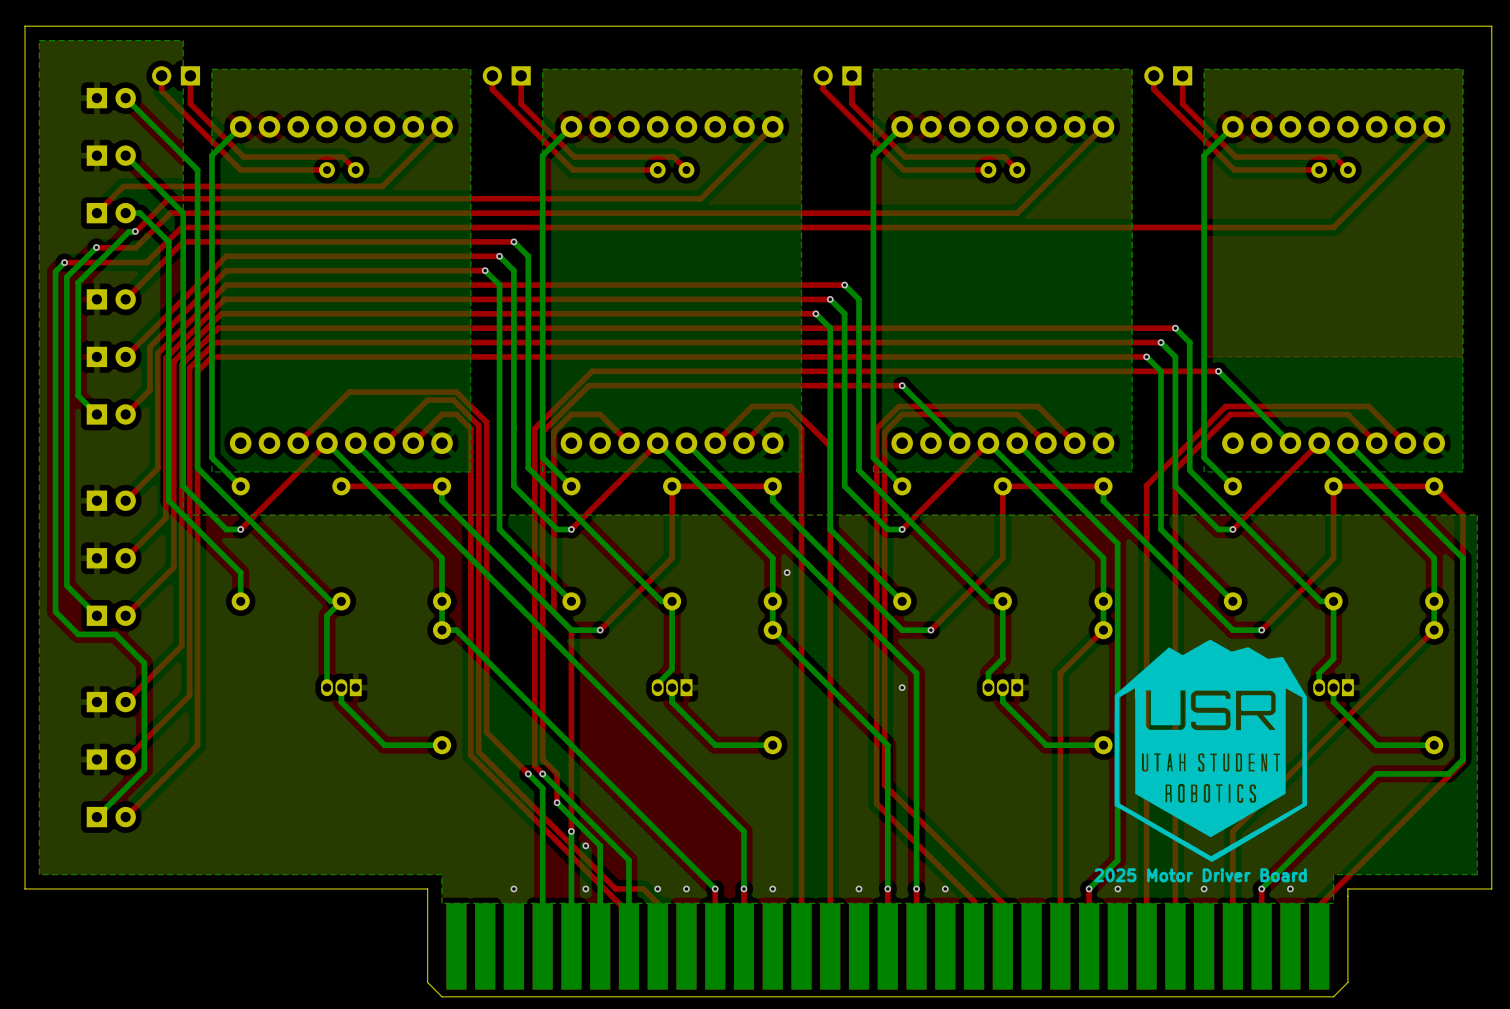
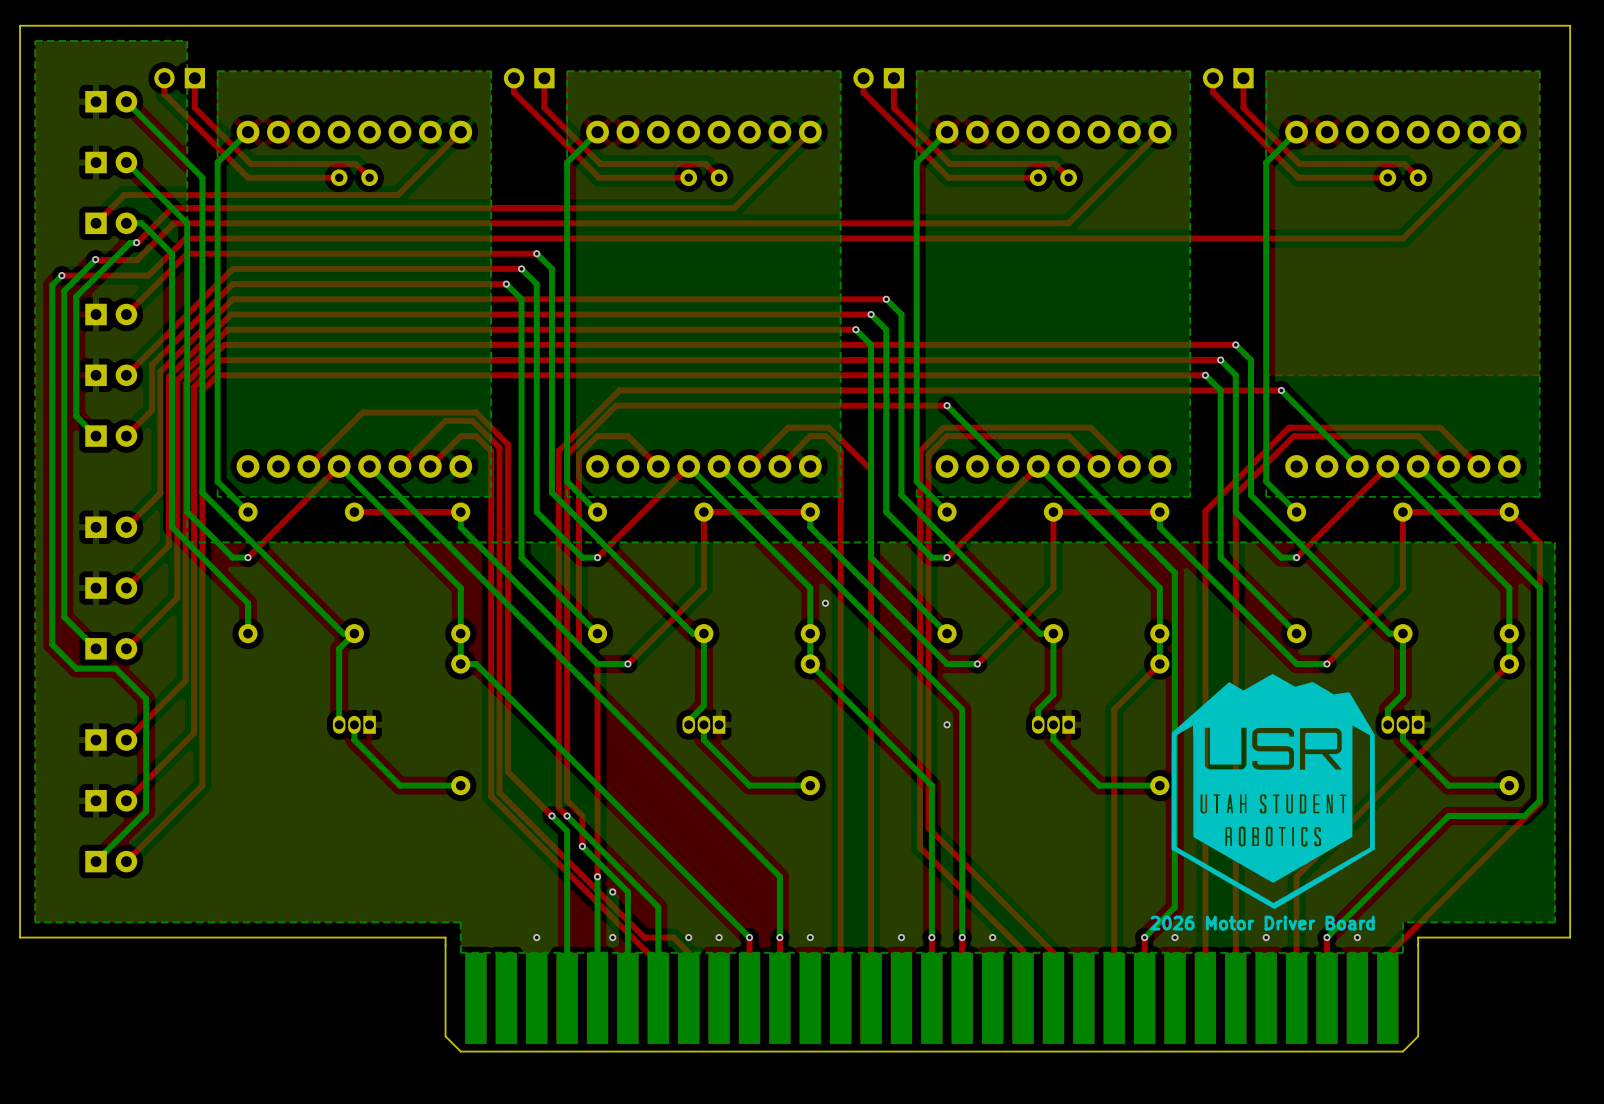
text: 2025 Motor Driver Board (1200, 875) -> 2026 Motor Driver Board (1262, 923)

